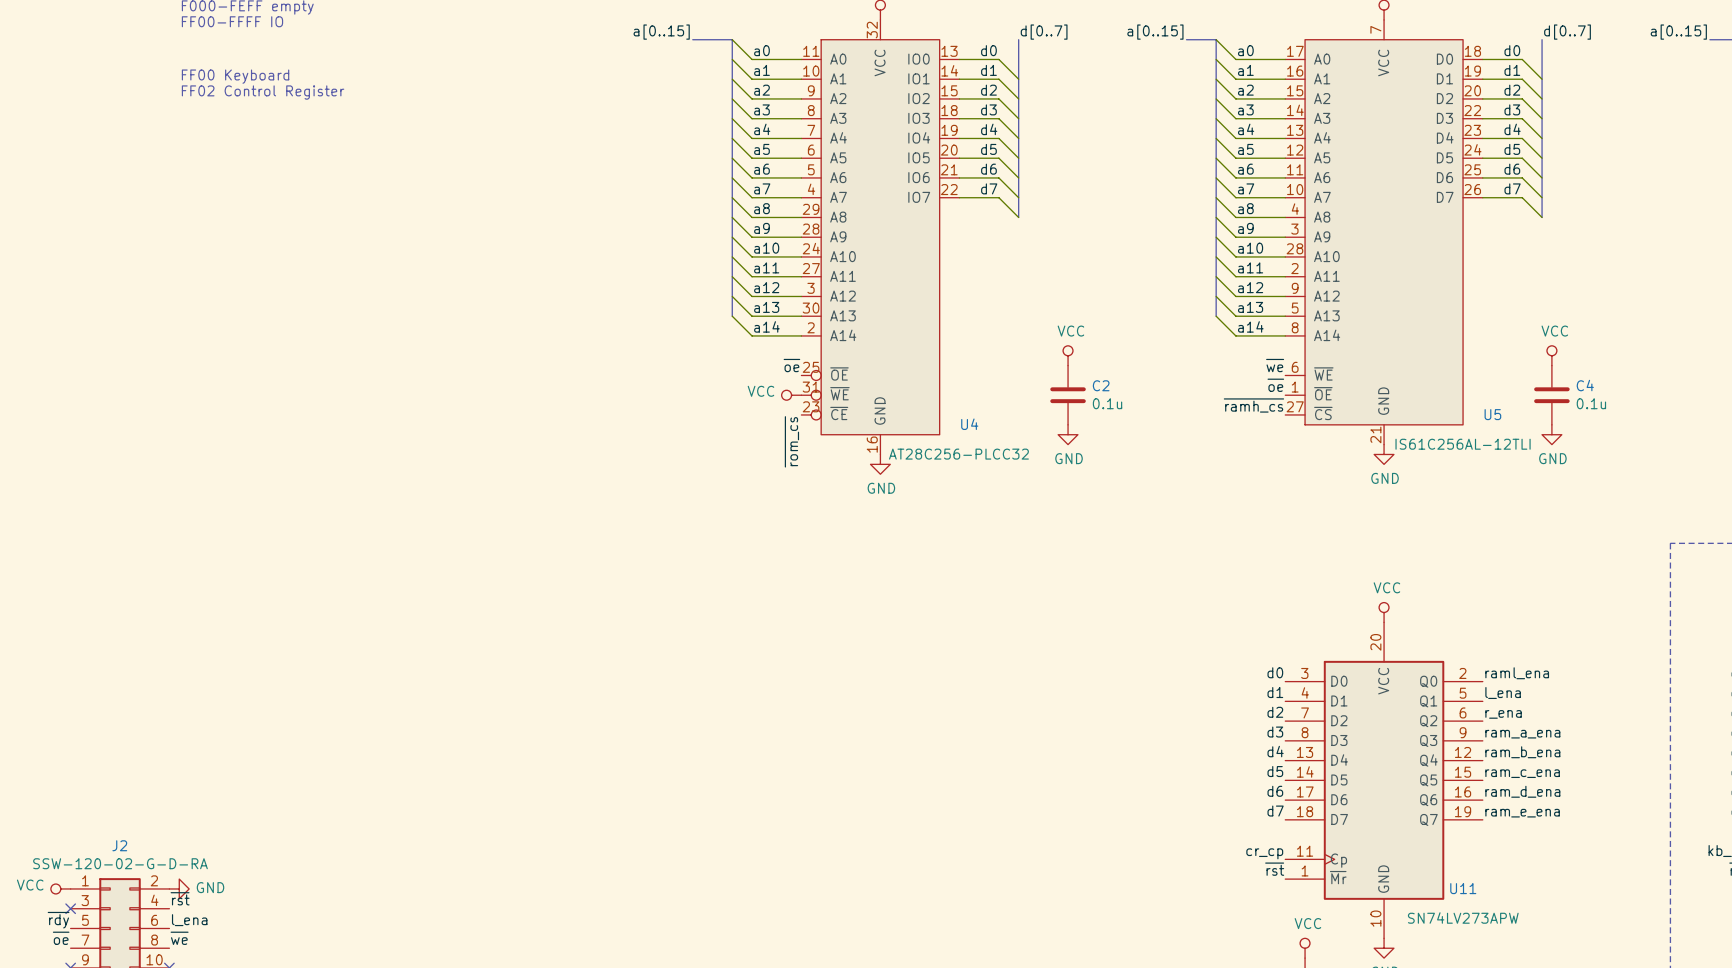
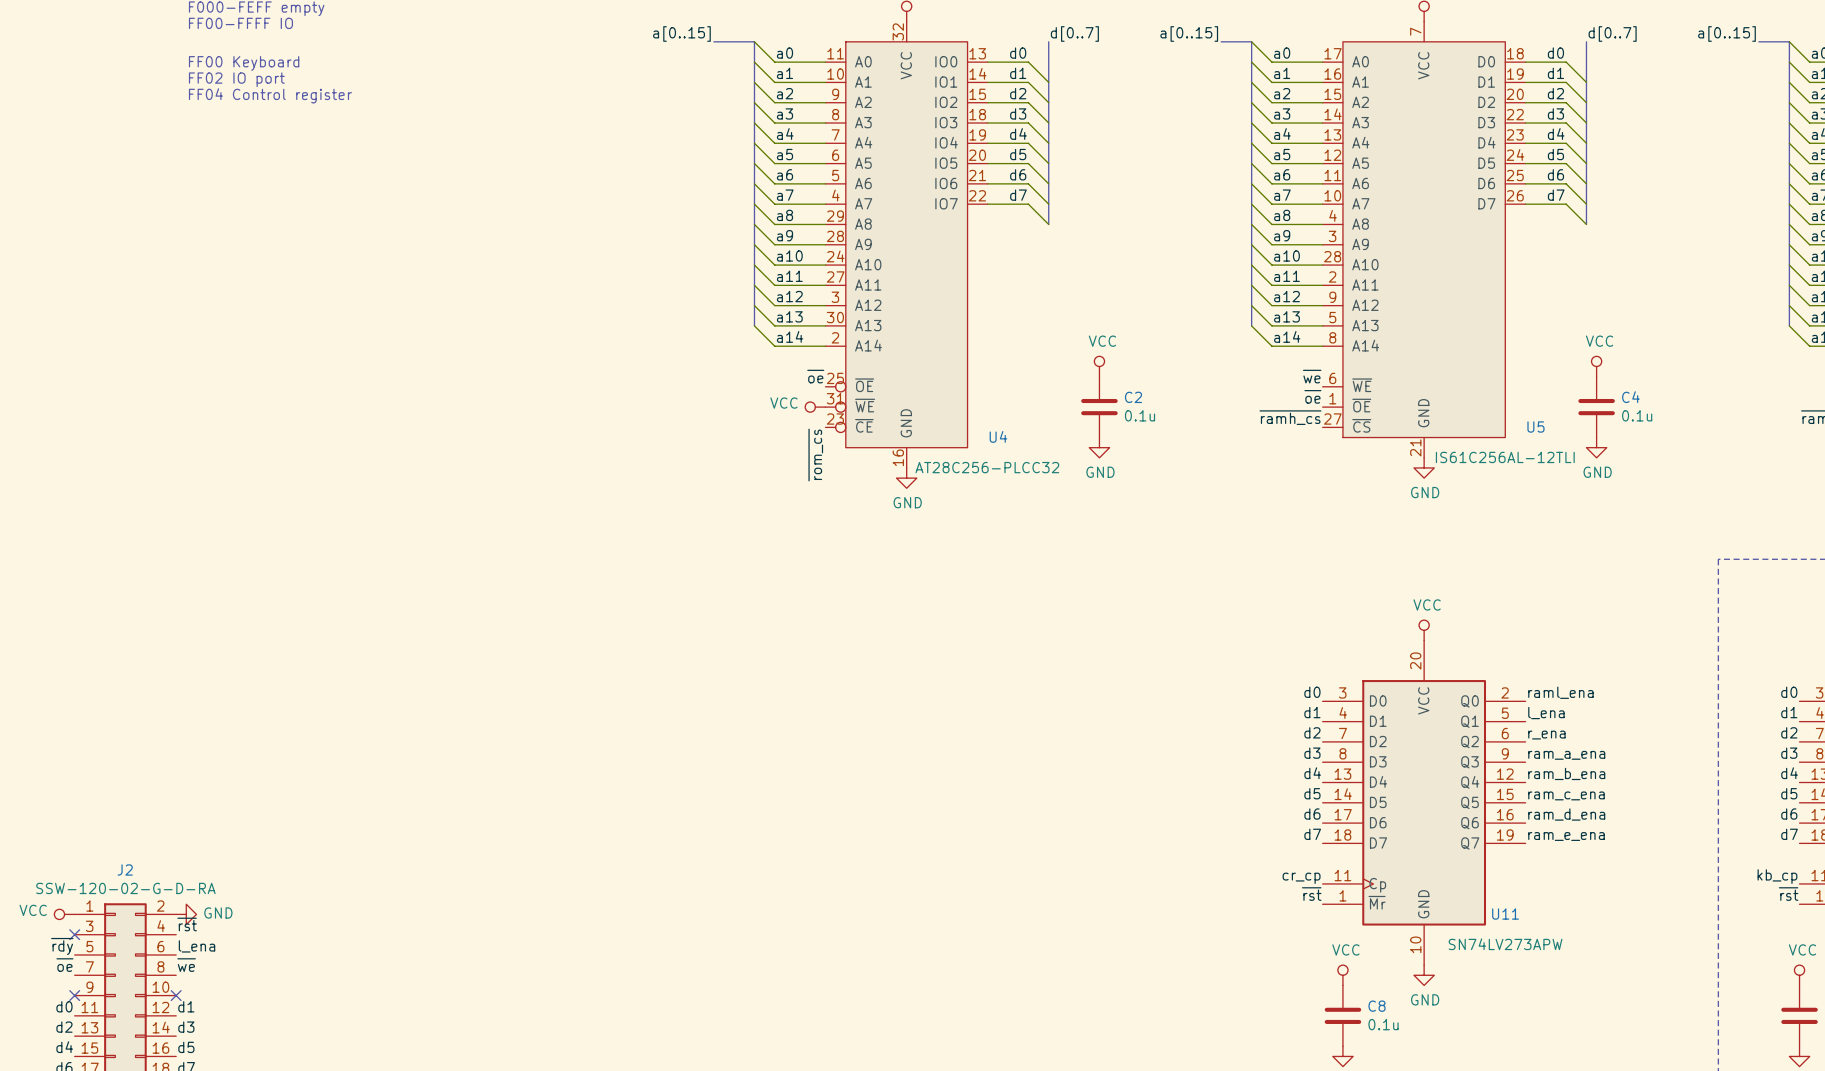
text: none -> FF00 Keyboard (244, 63)
text: FF00 Keyboard (235, 76) -> FF02 IO port (236, 79)
text: FF02 Control Register (263, 92) -> FF04 Control register (270, 95)

